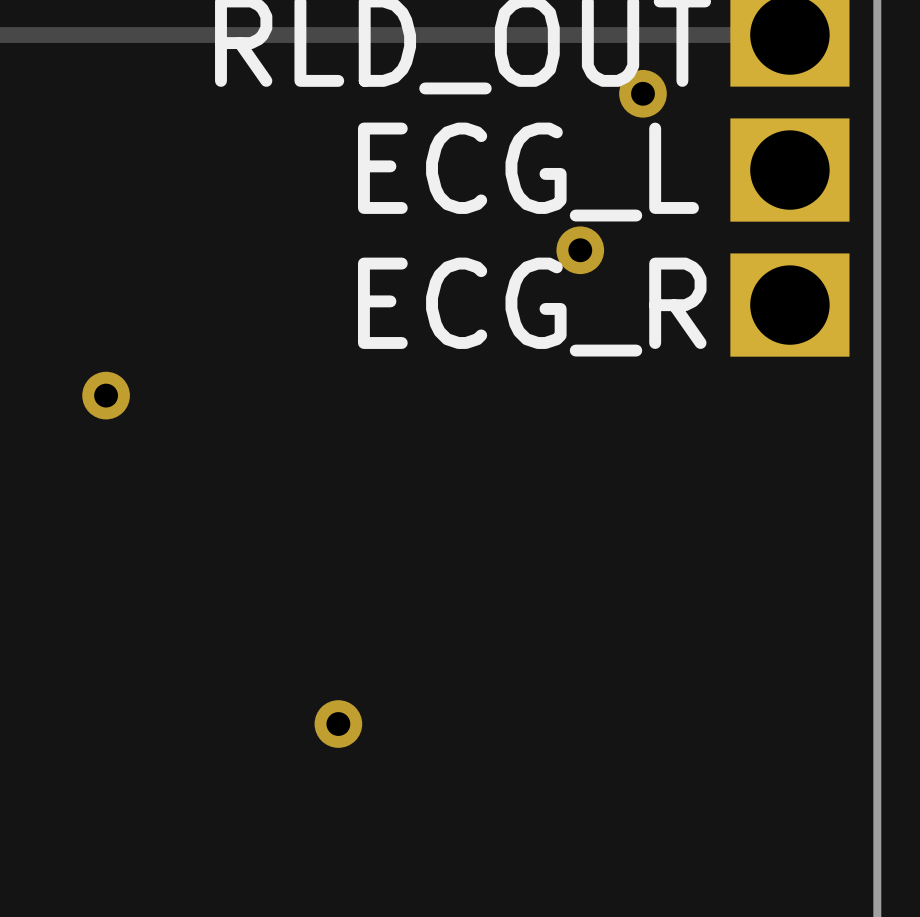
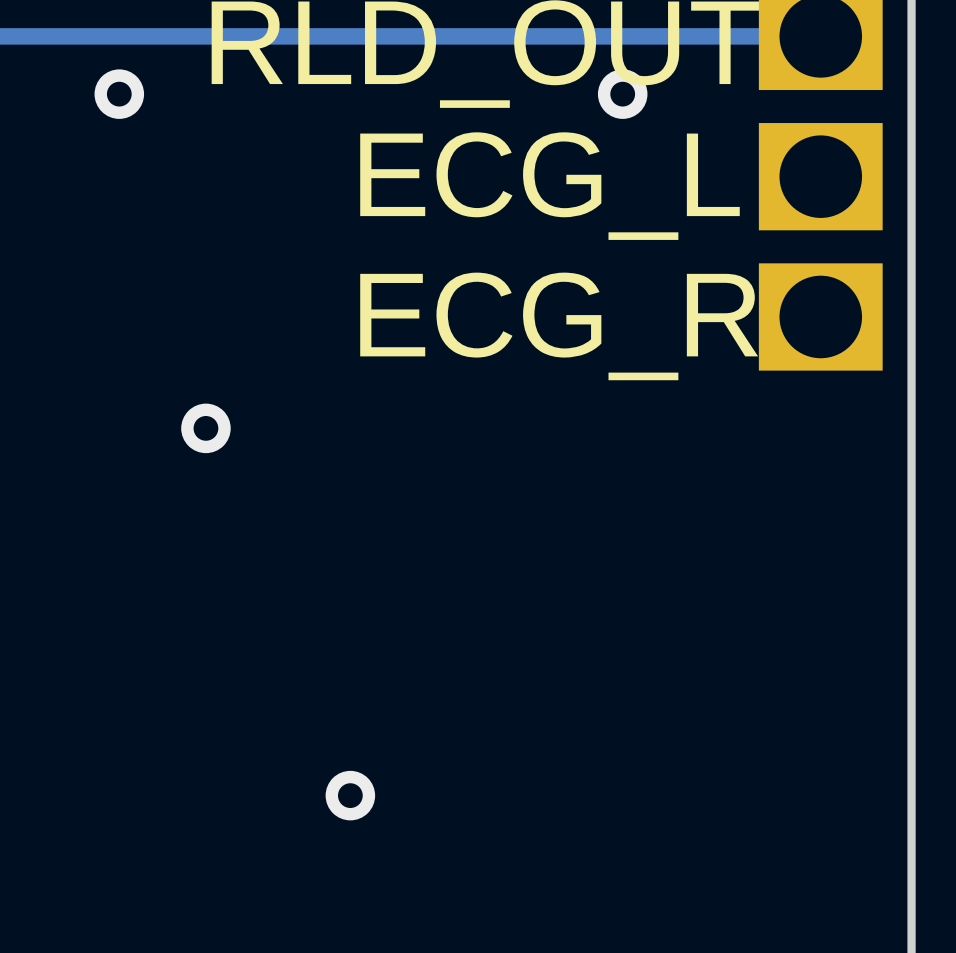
via: none -> (119, 94)
via position: (642, 93) -> (622, 94)
via: (580, 250) -> none
via position: (106, 395) -> (205, 428)
via position: (338, 724) -> (350, 795)

